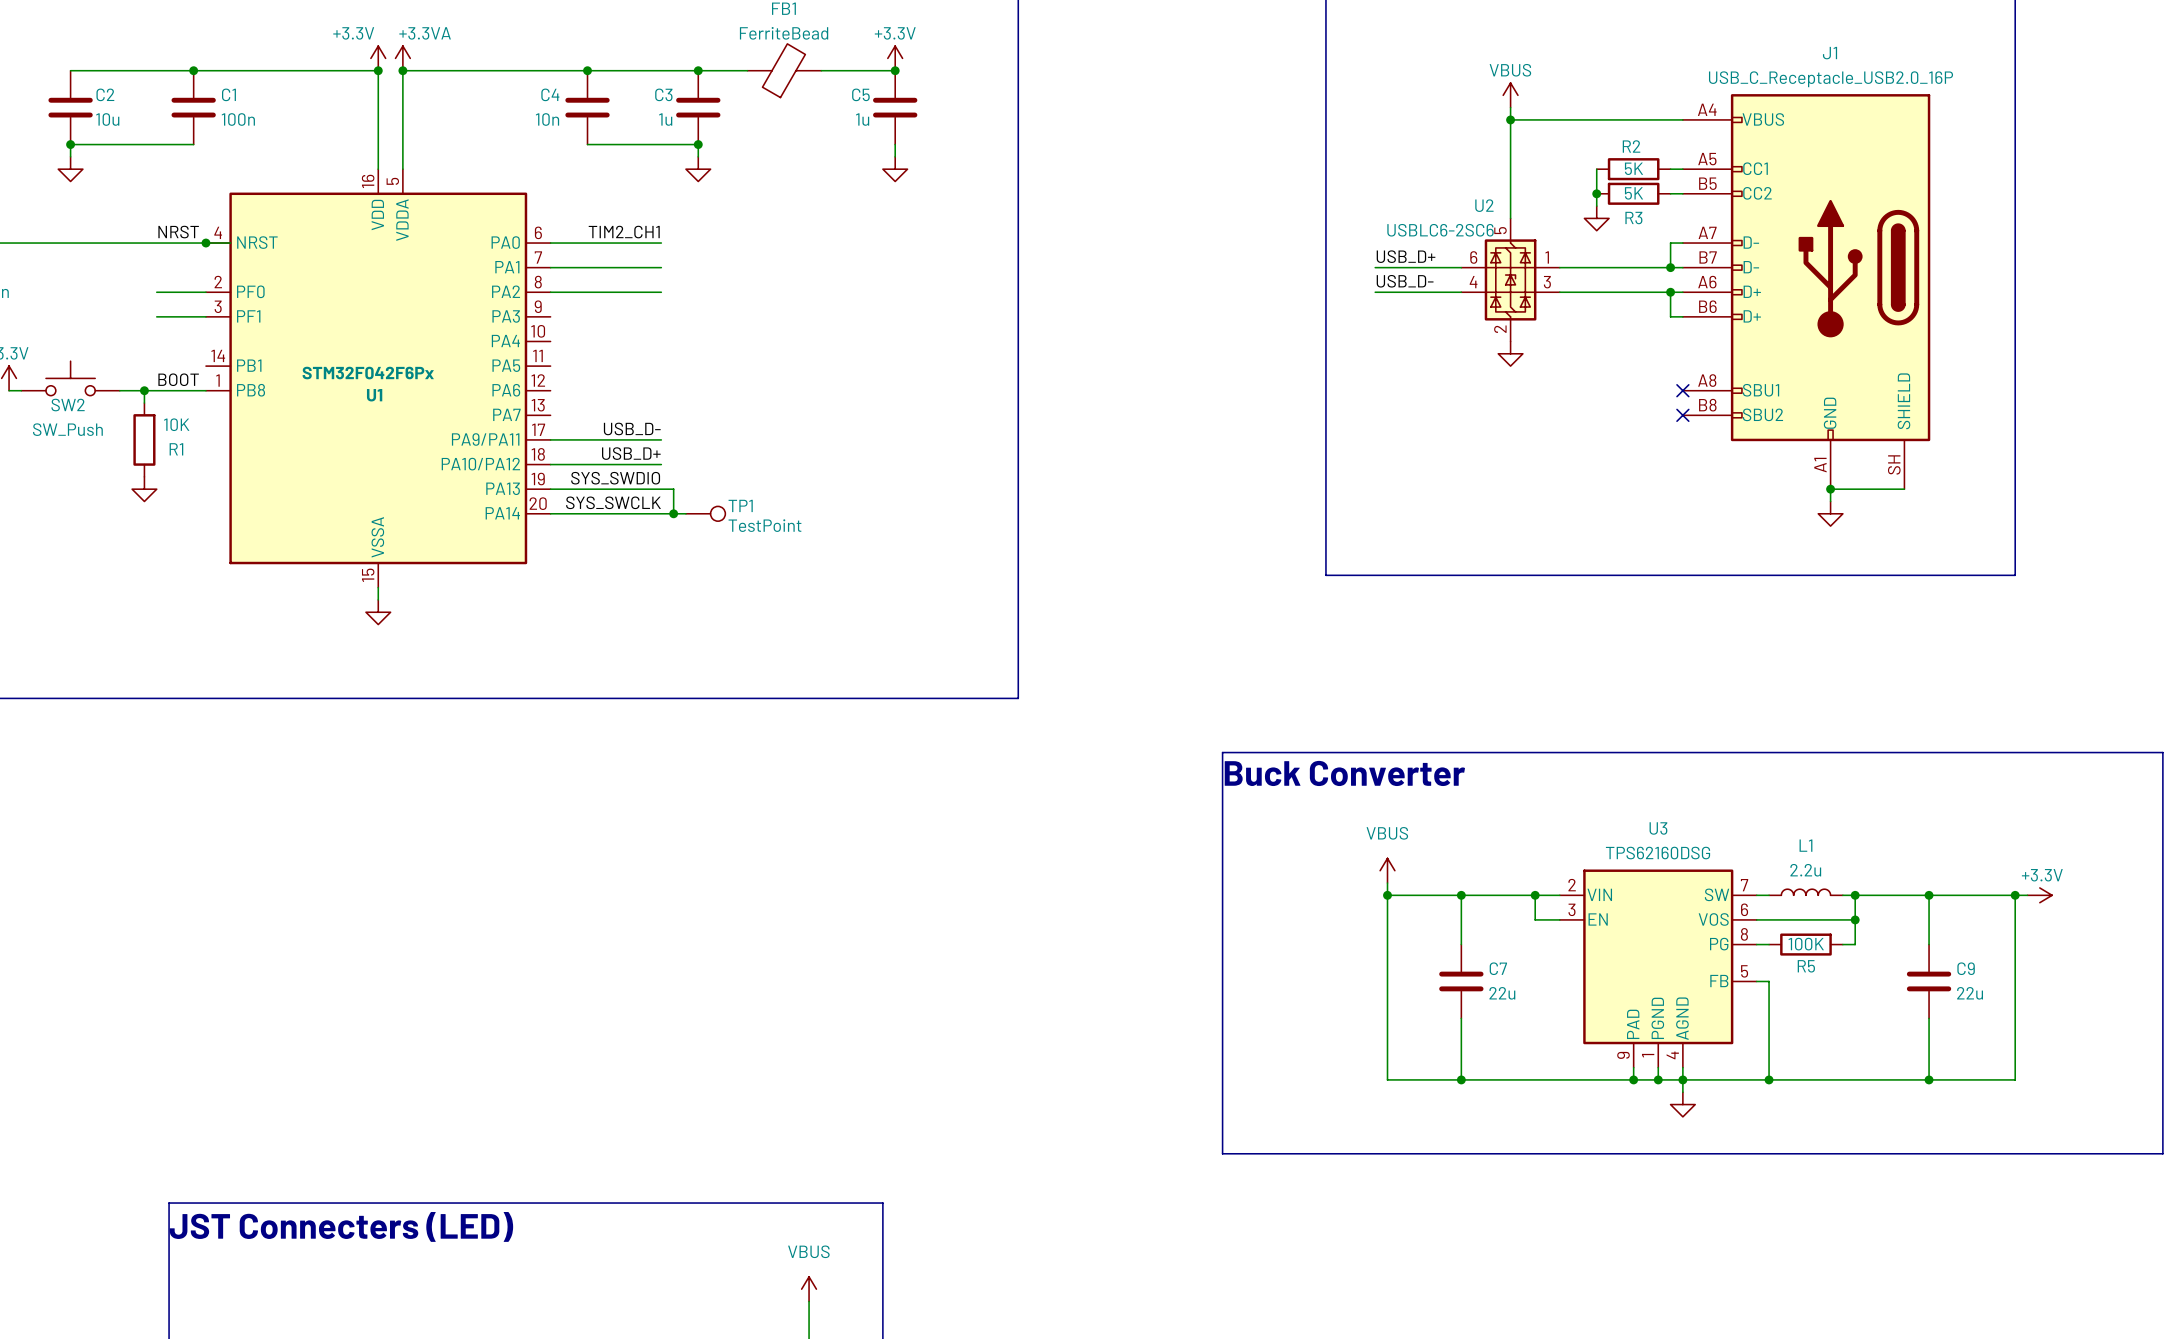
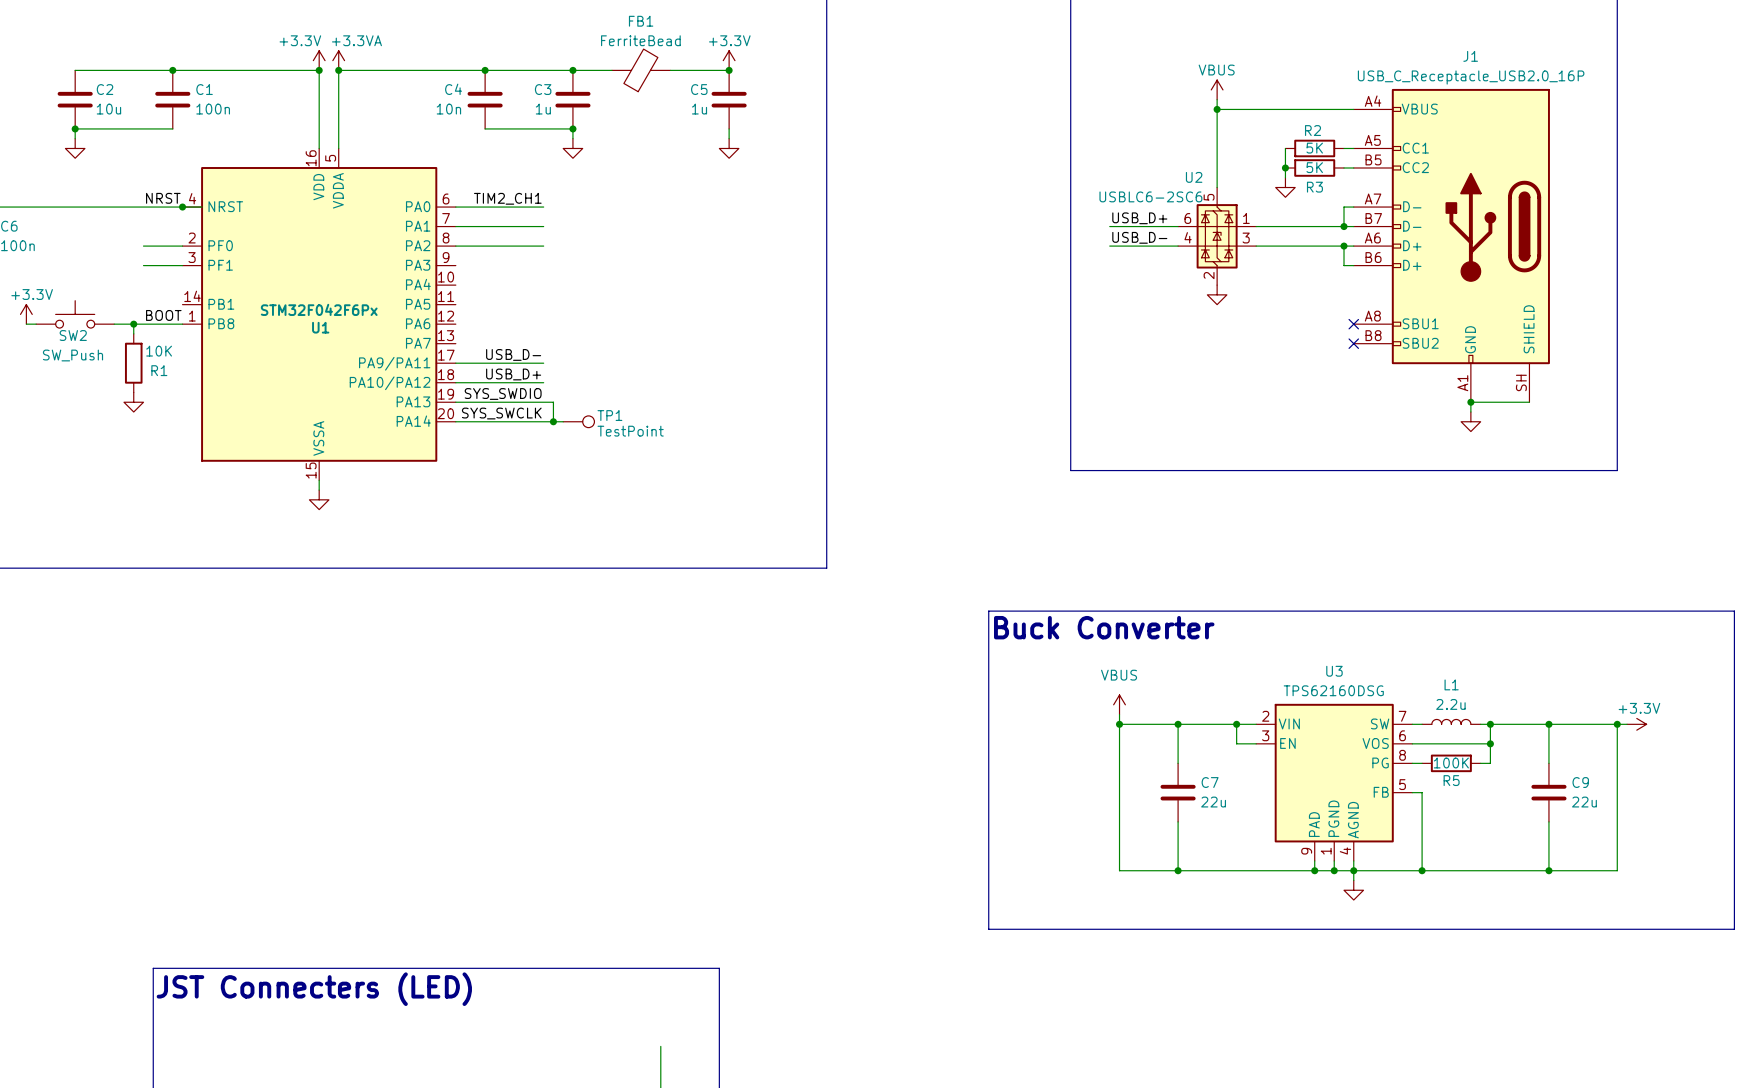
power symbol: VBUS (809, 1289) -> none

